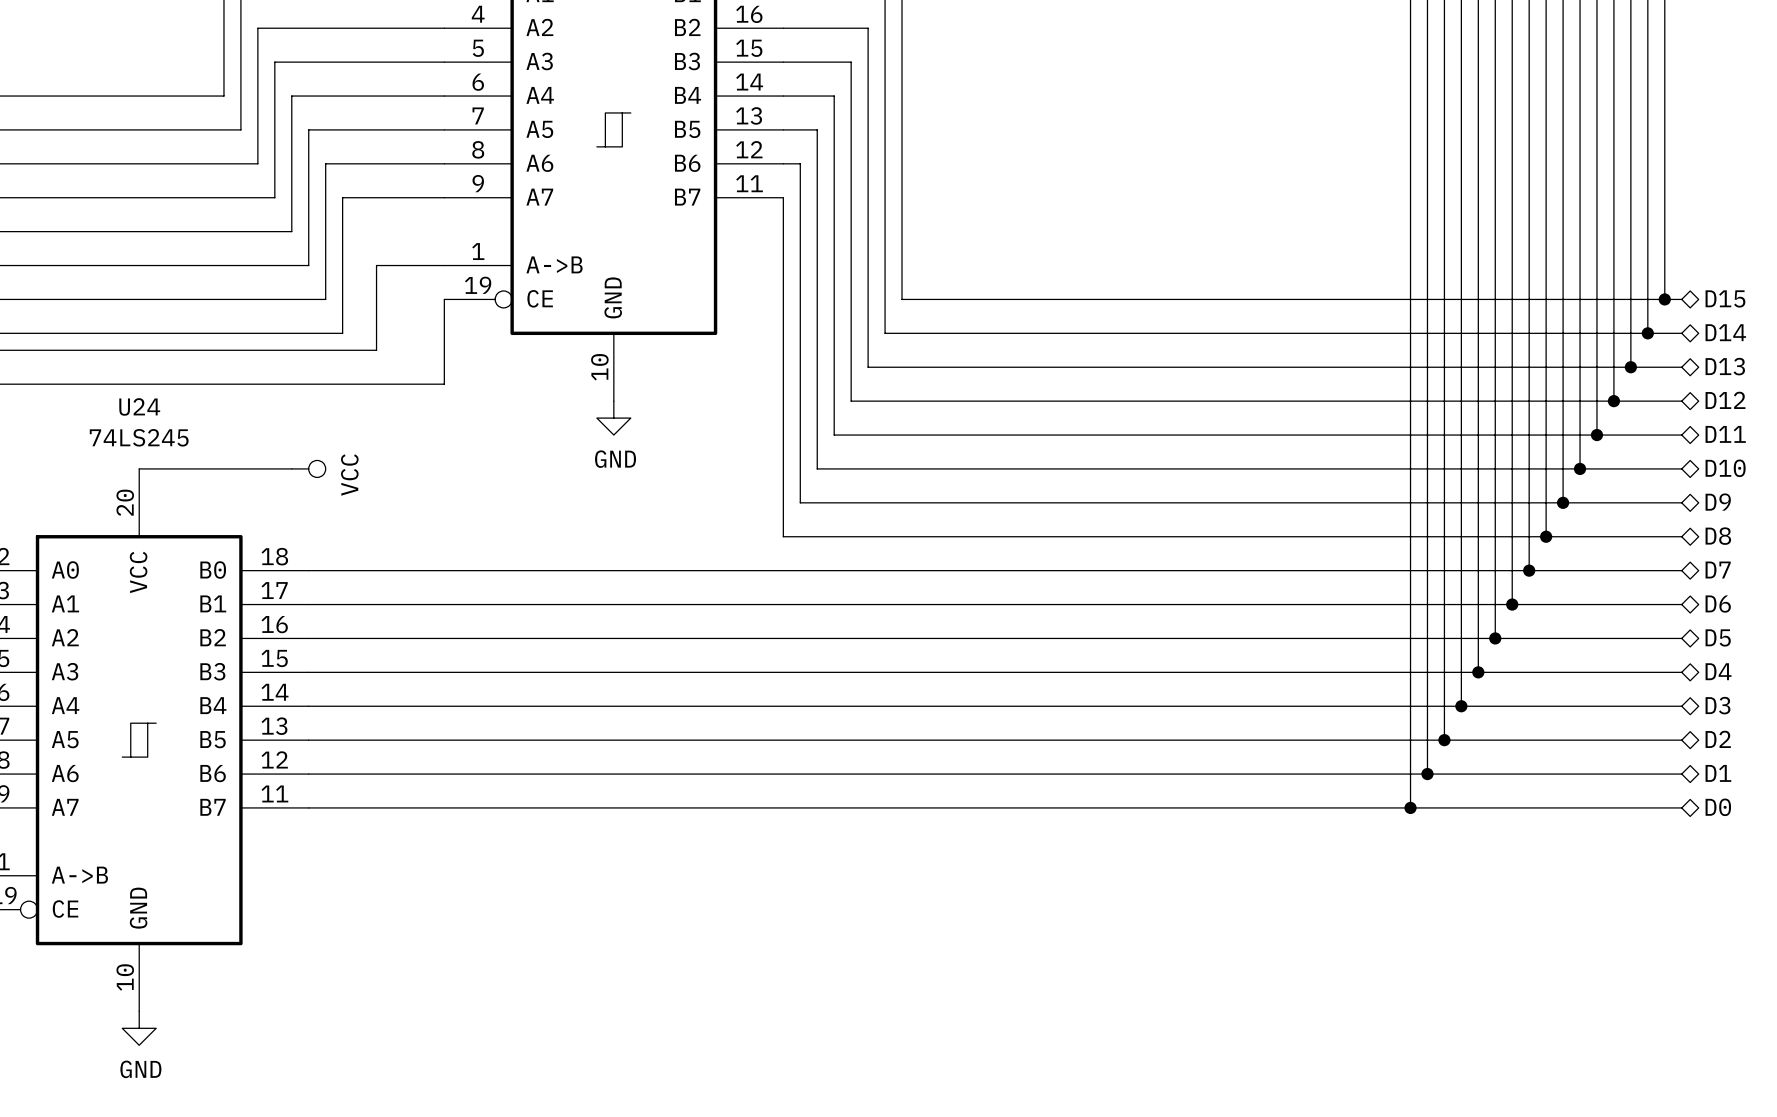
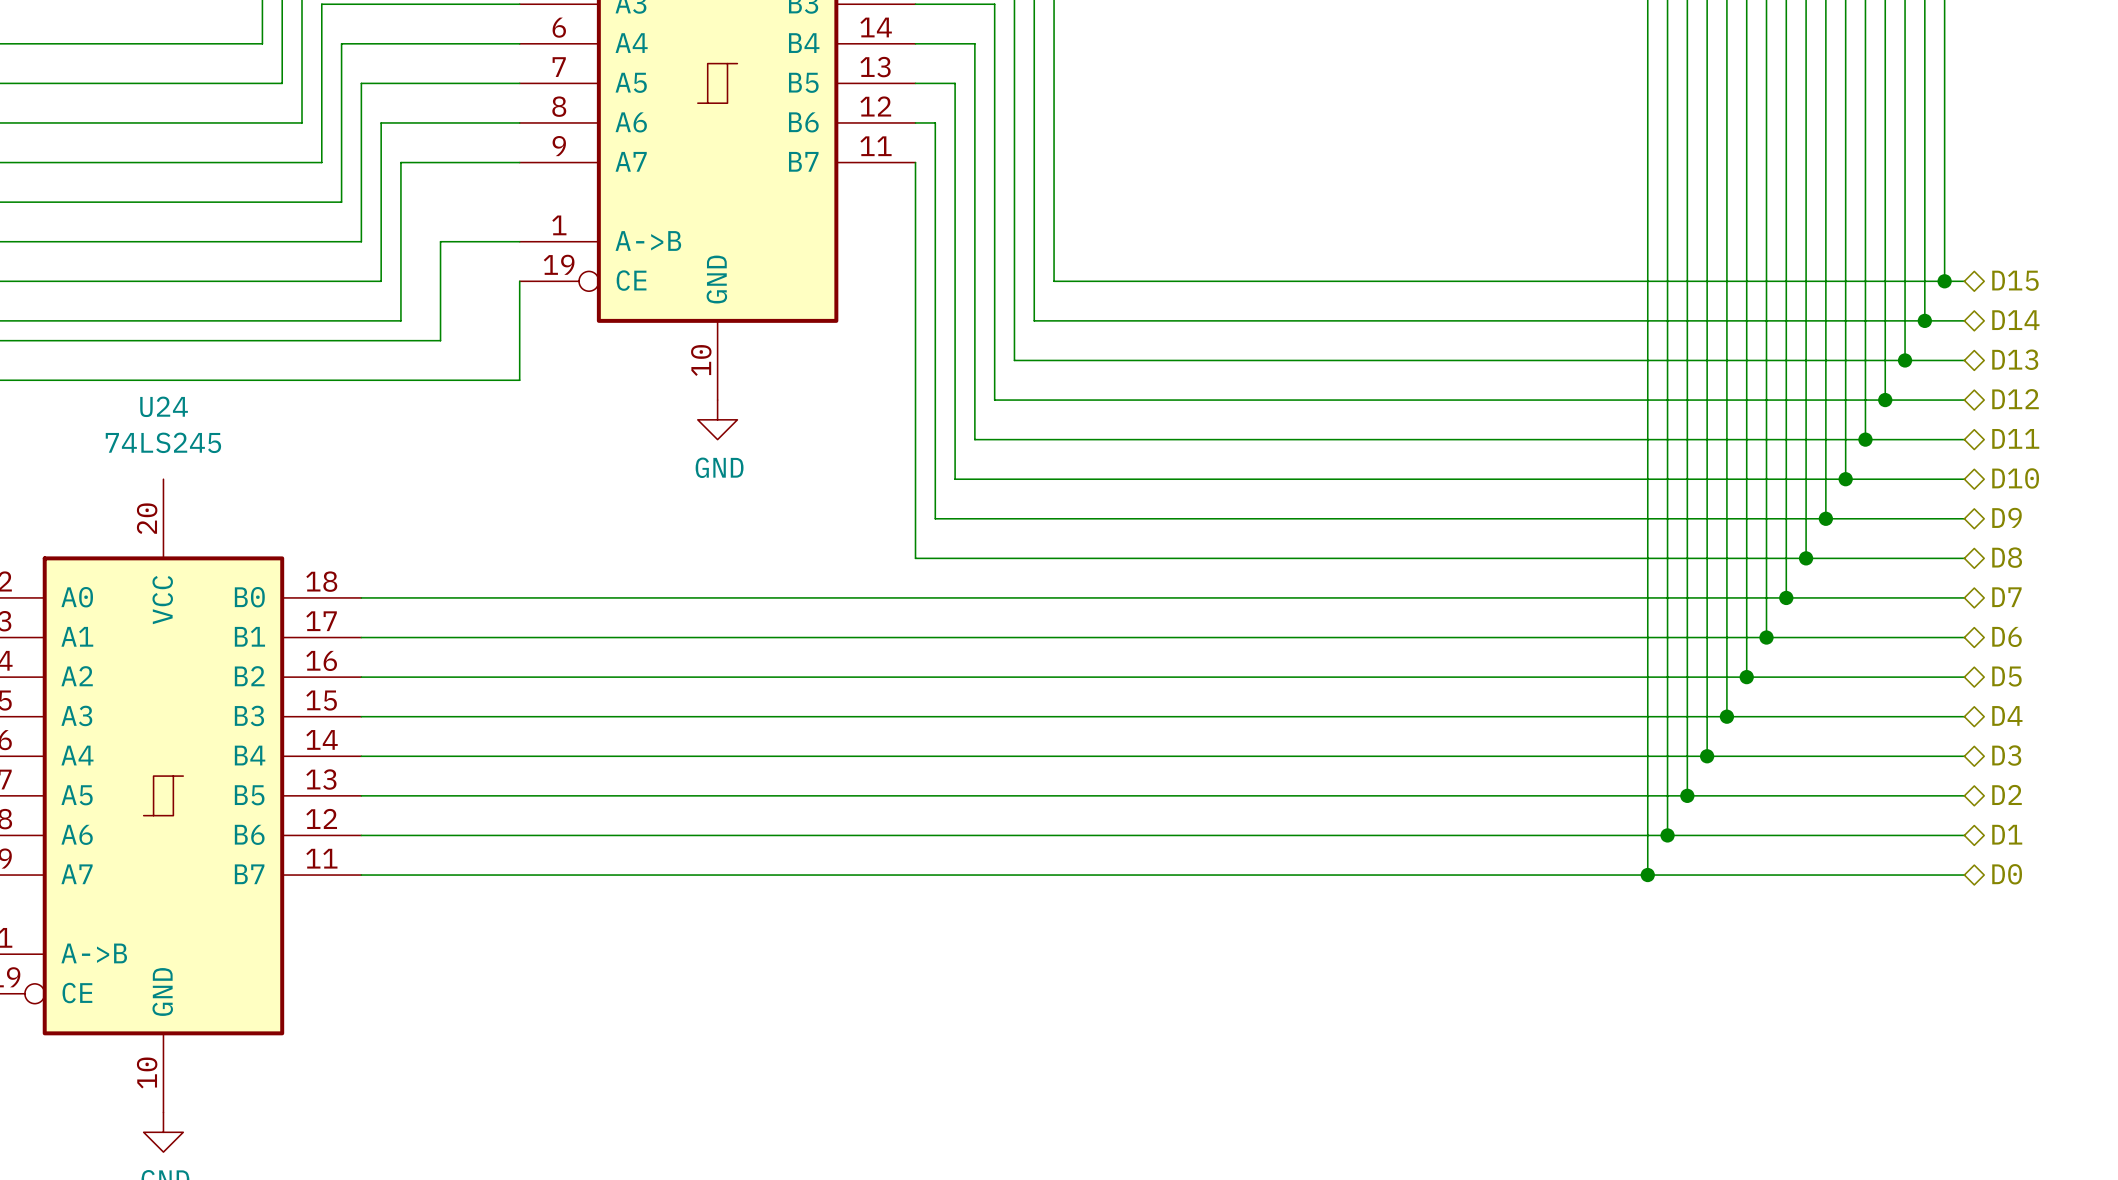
wire: (139, 468) (291, 468) -> none
power symbol: VCC (308, 468) -> none

